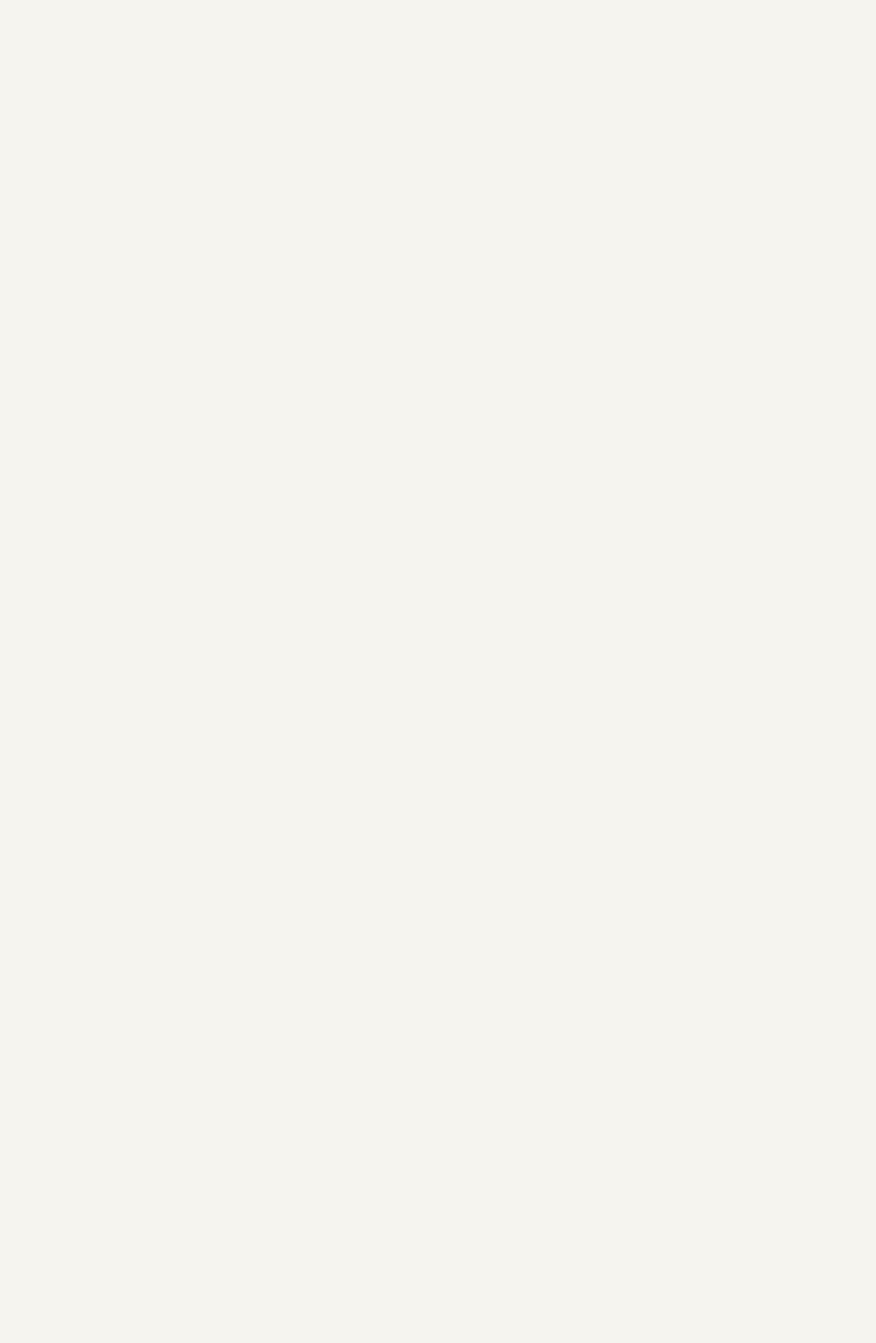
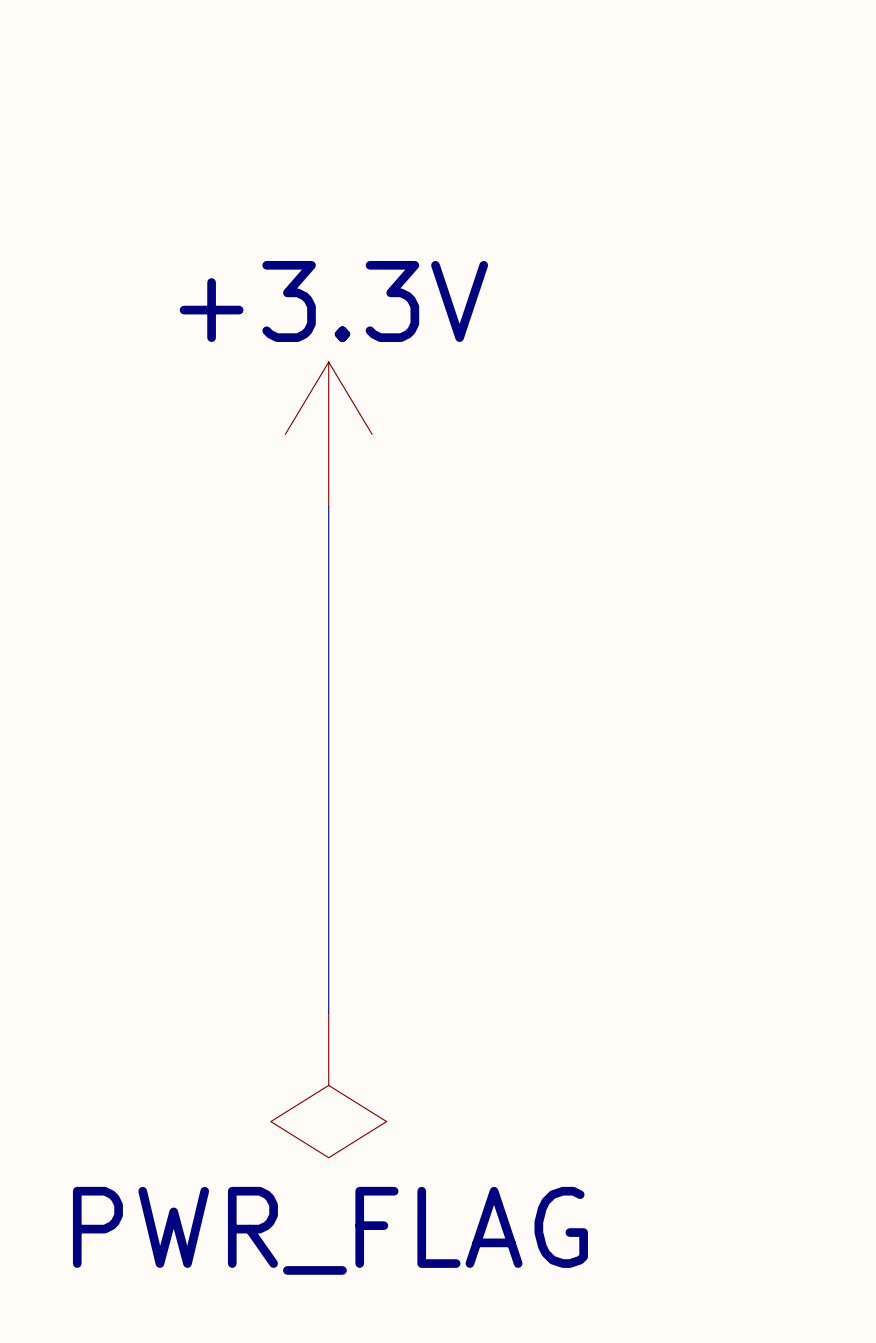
power symbol: none -> +3.3V (328, 434)
wire: none -> (328, 506) (328, 1013)
power symbol: none -> PWR_FLAG (328, 1085)

